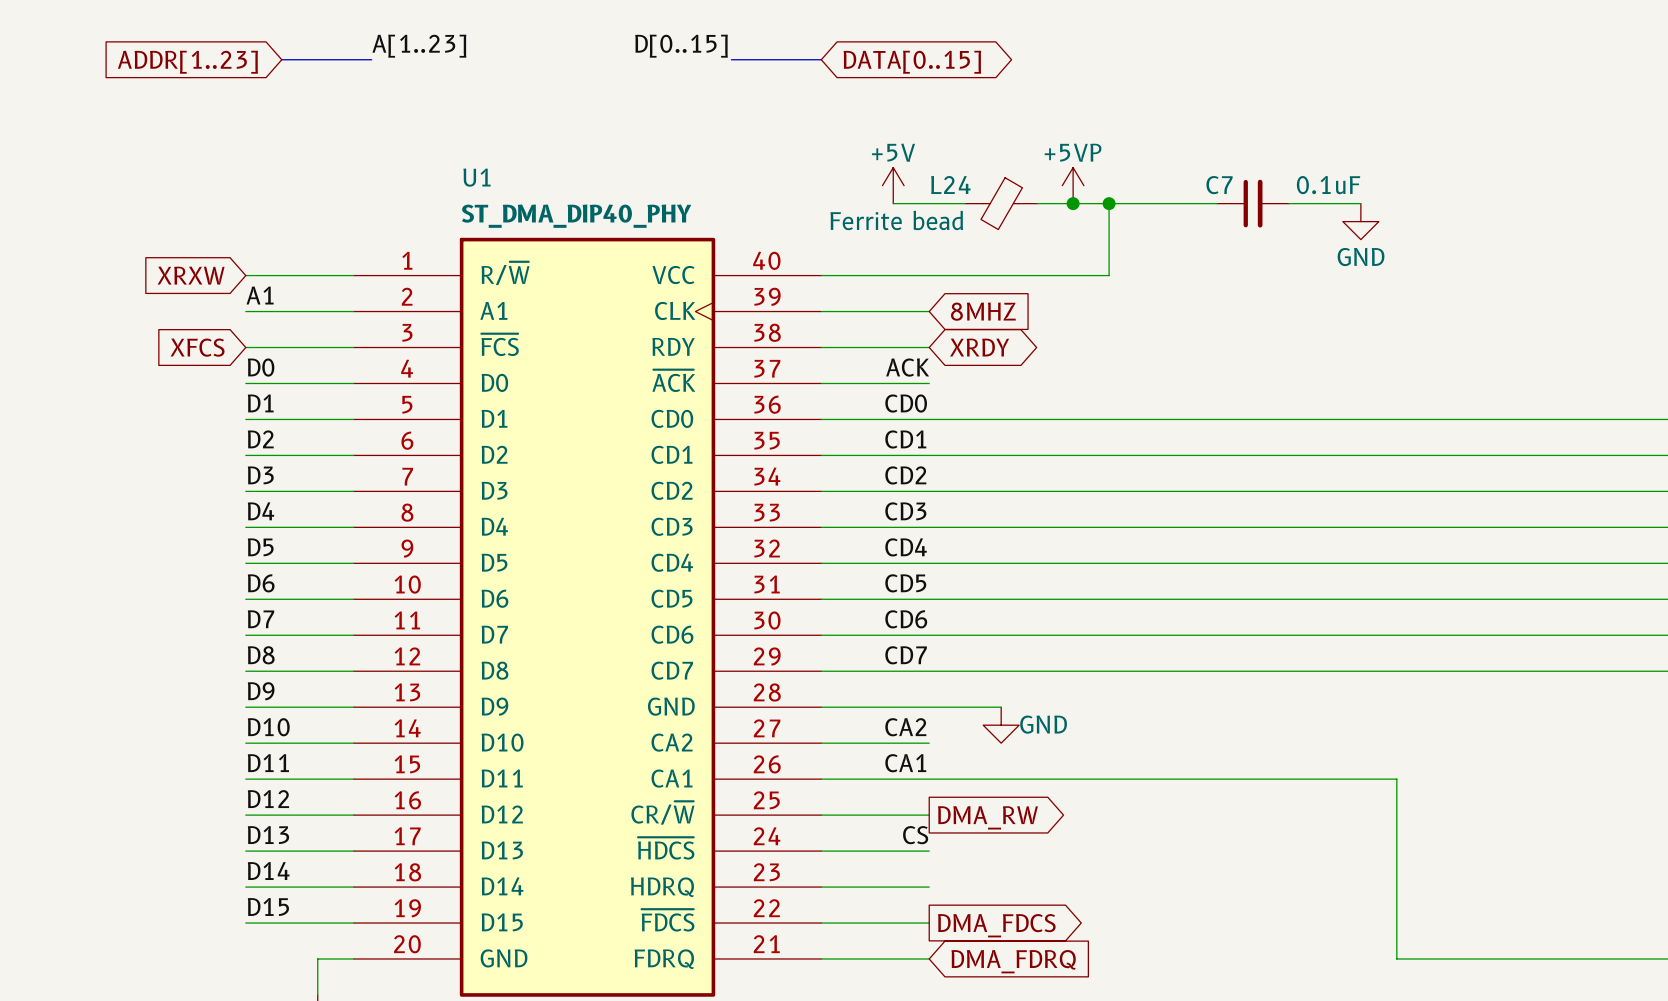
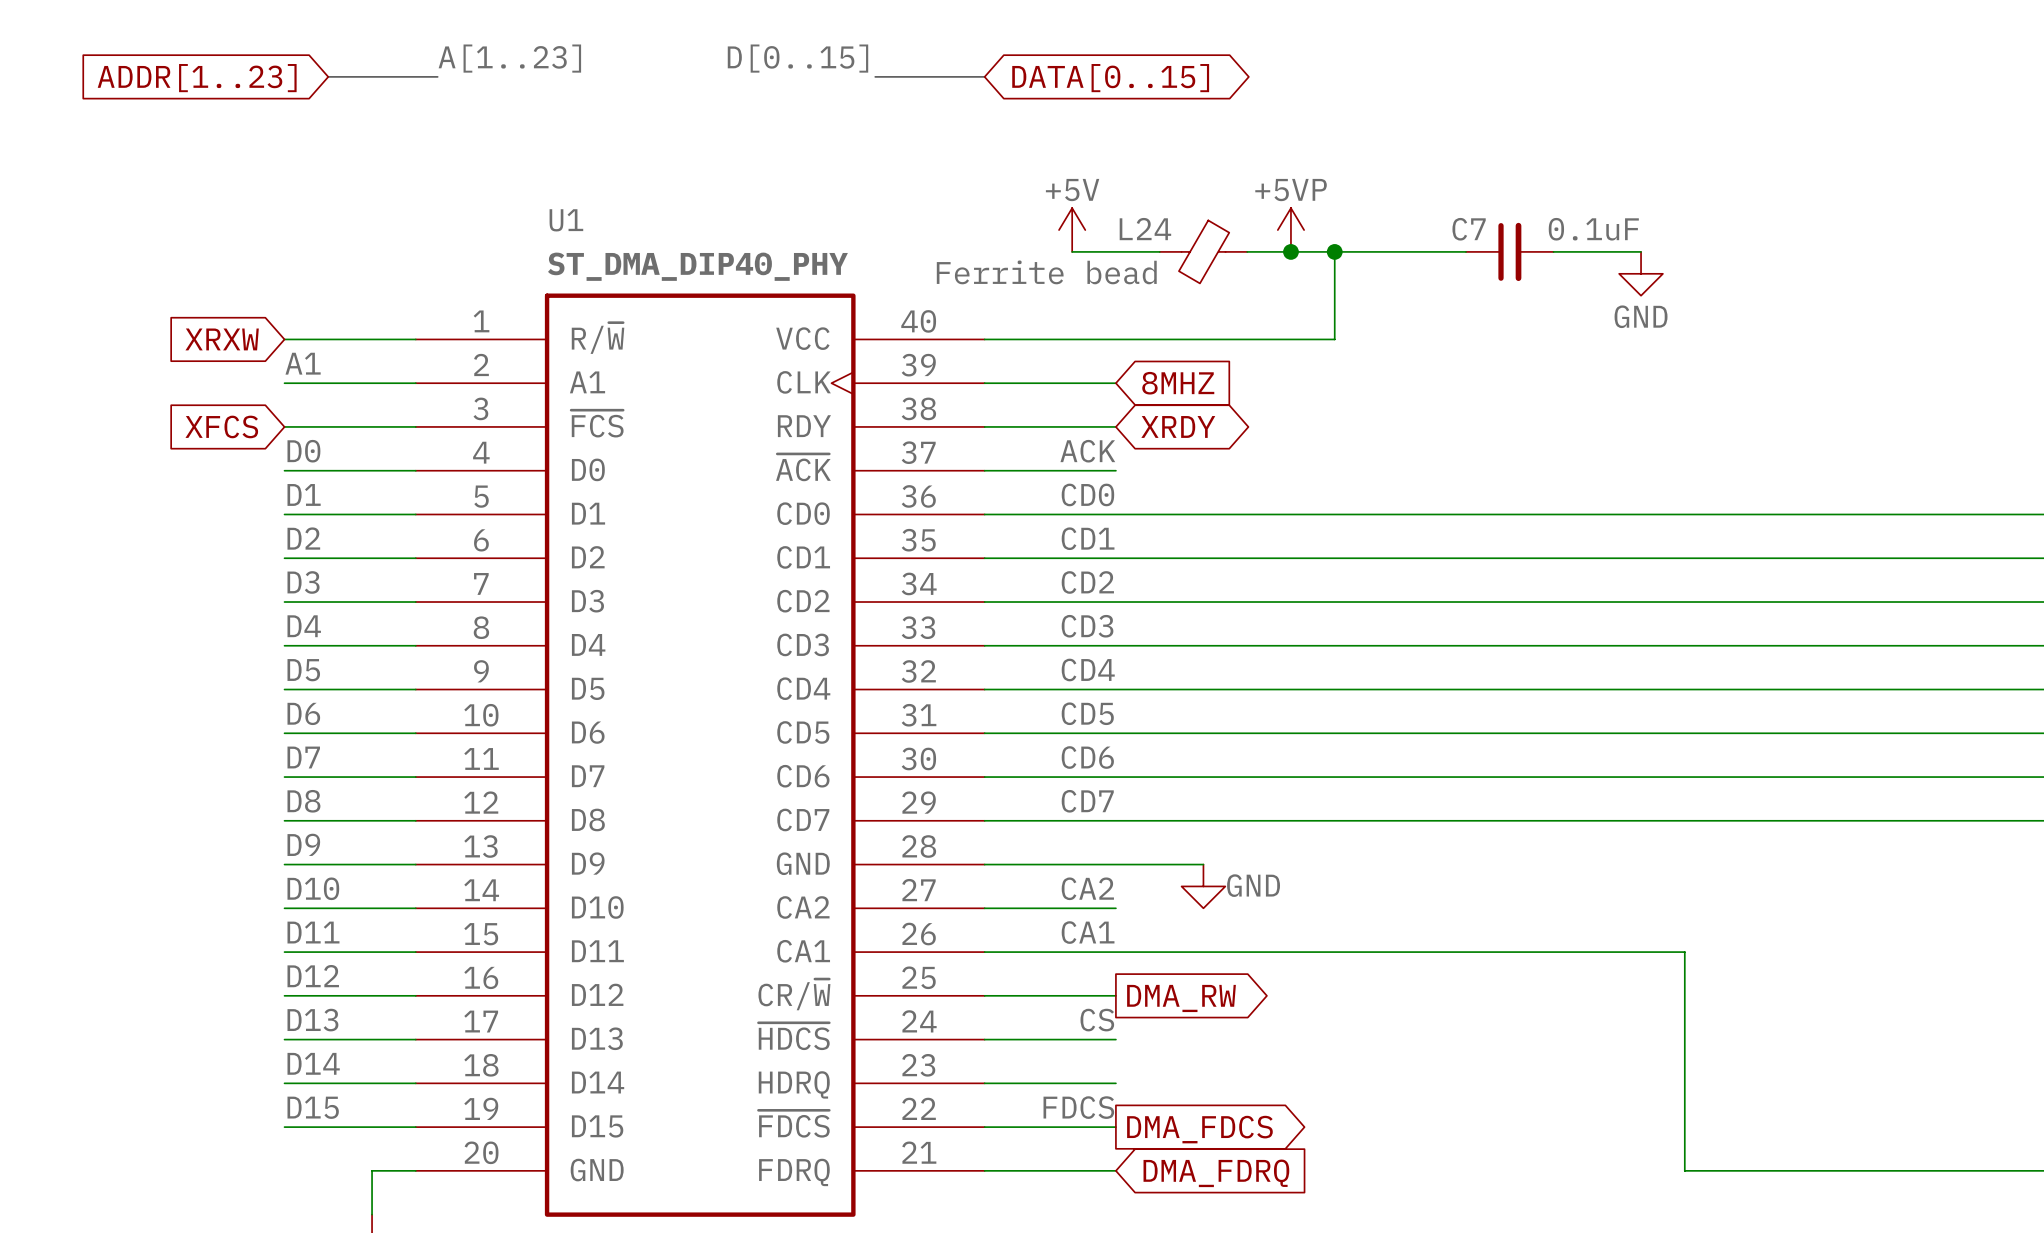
label: none -> FDCS (1078, 1107)

